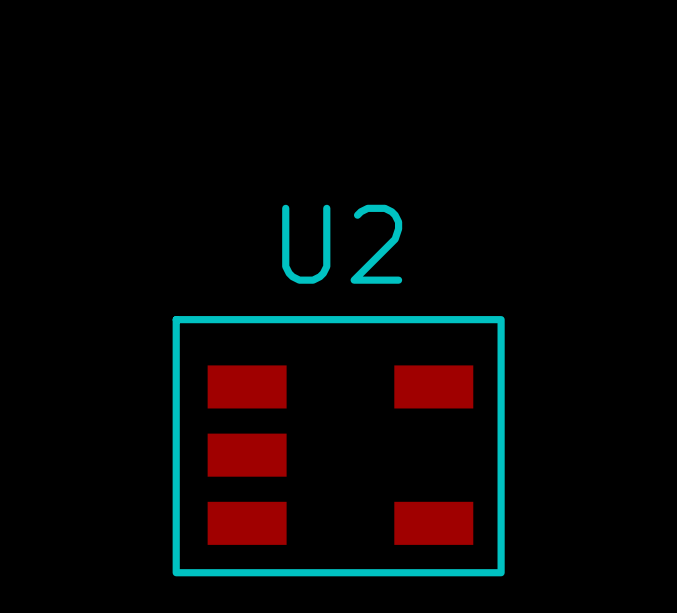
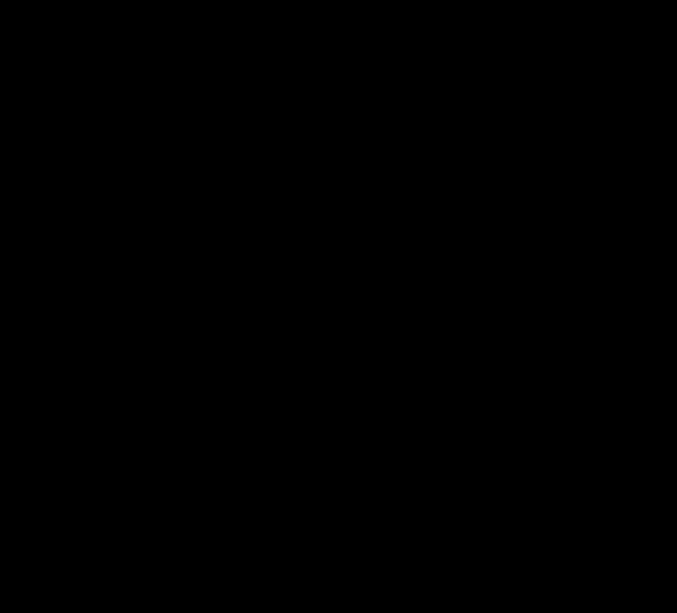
U2: (338, 446) -> none

